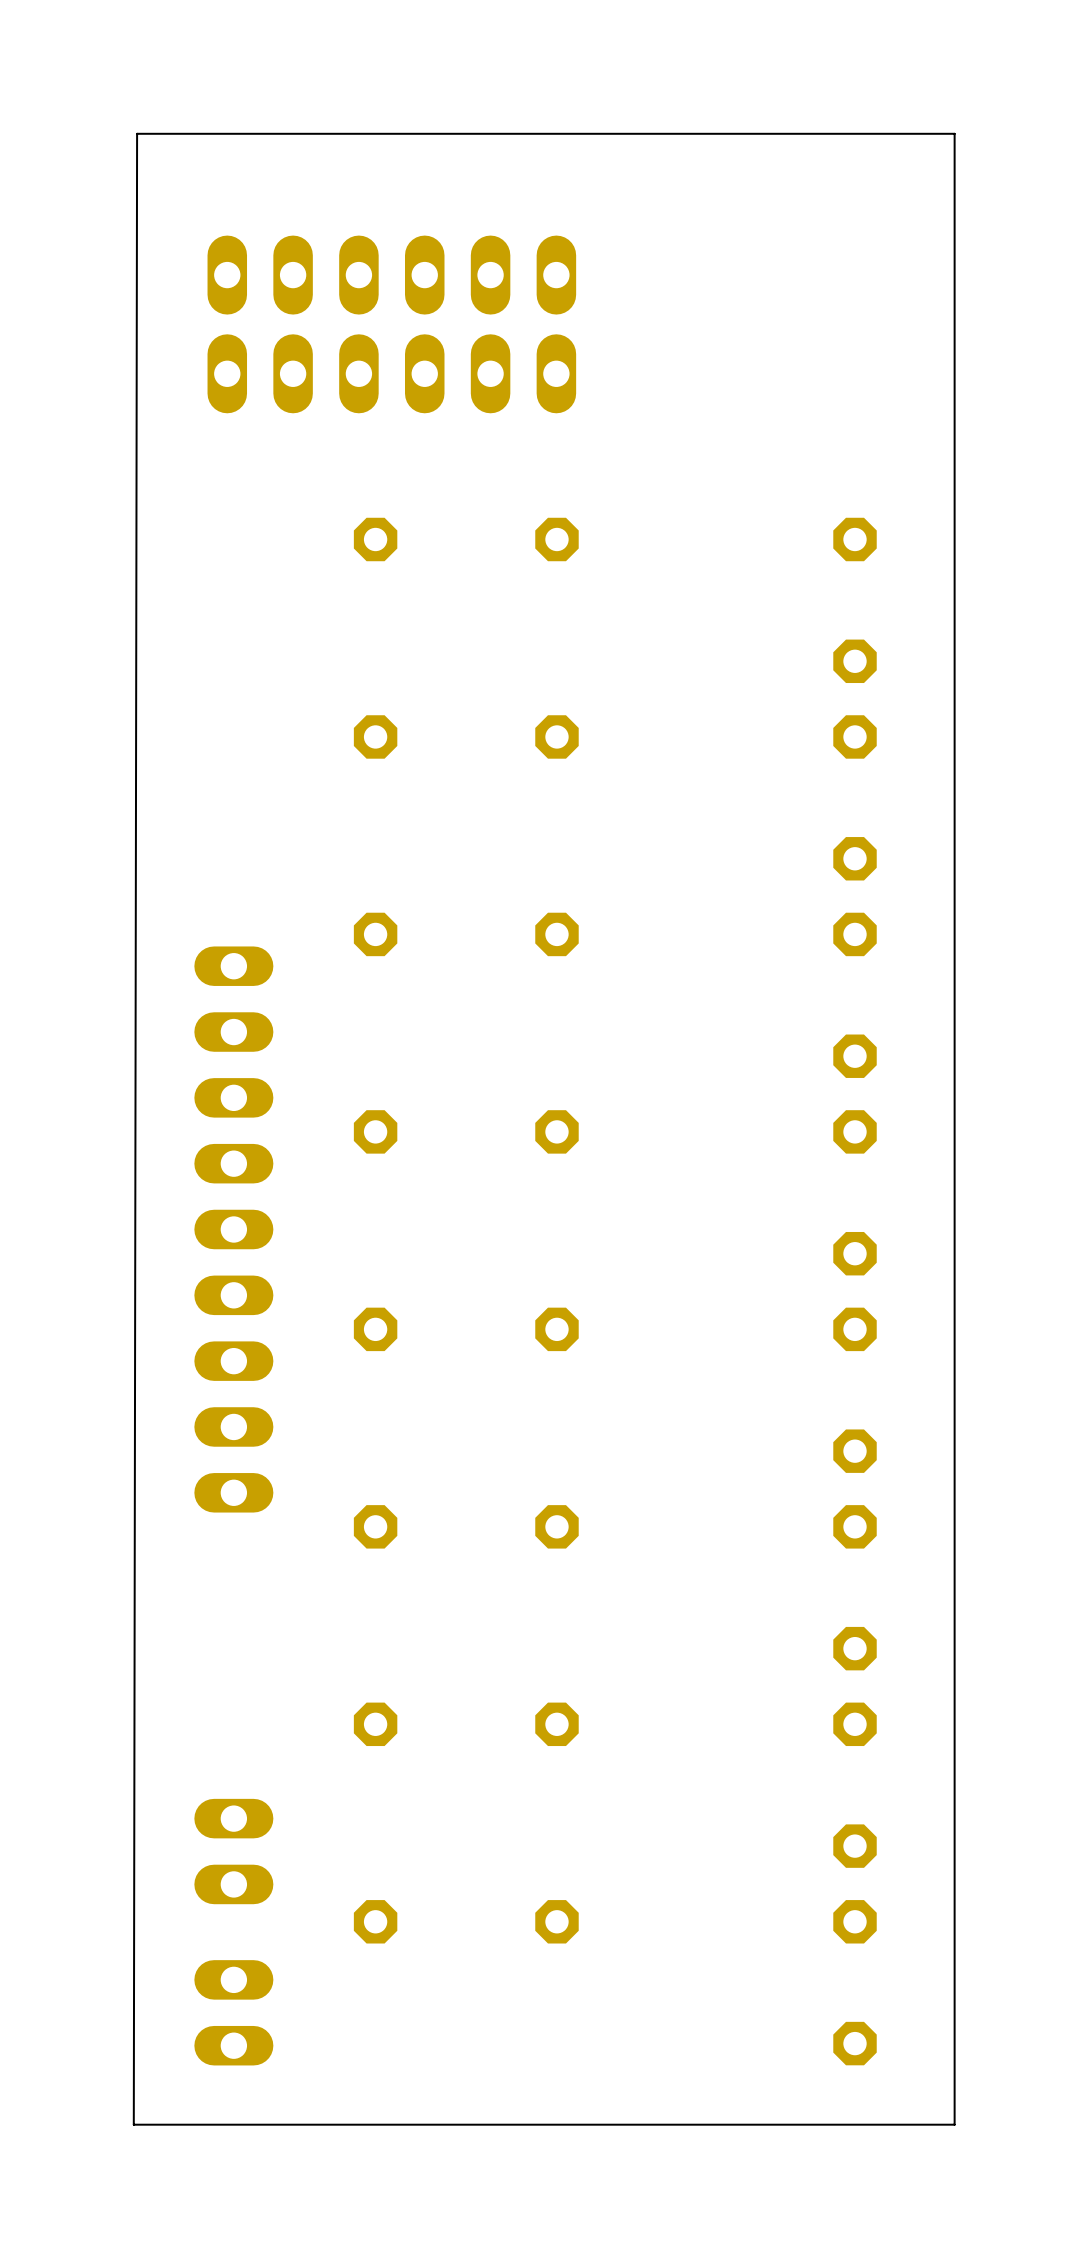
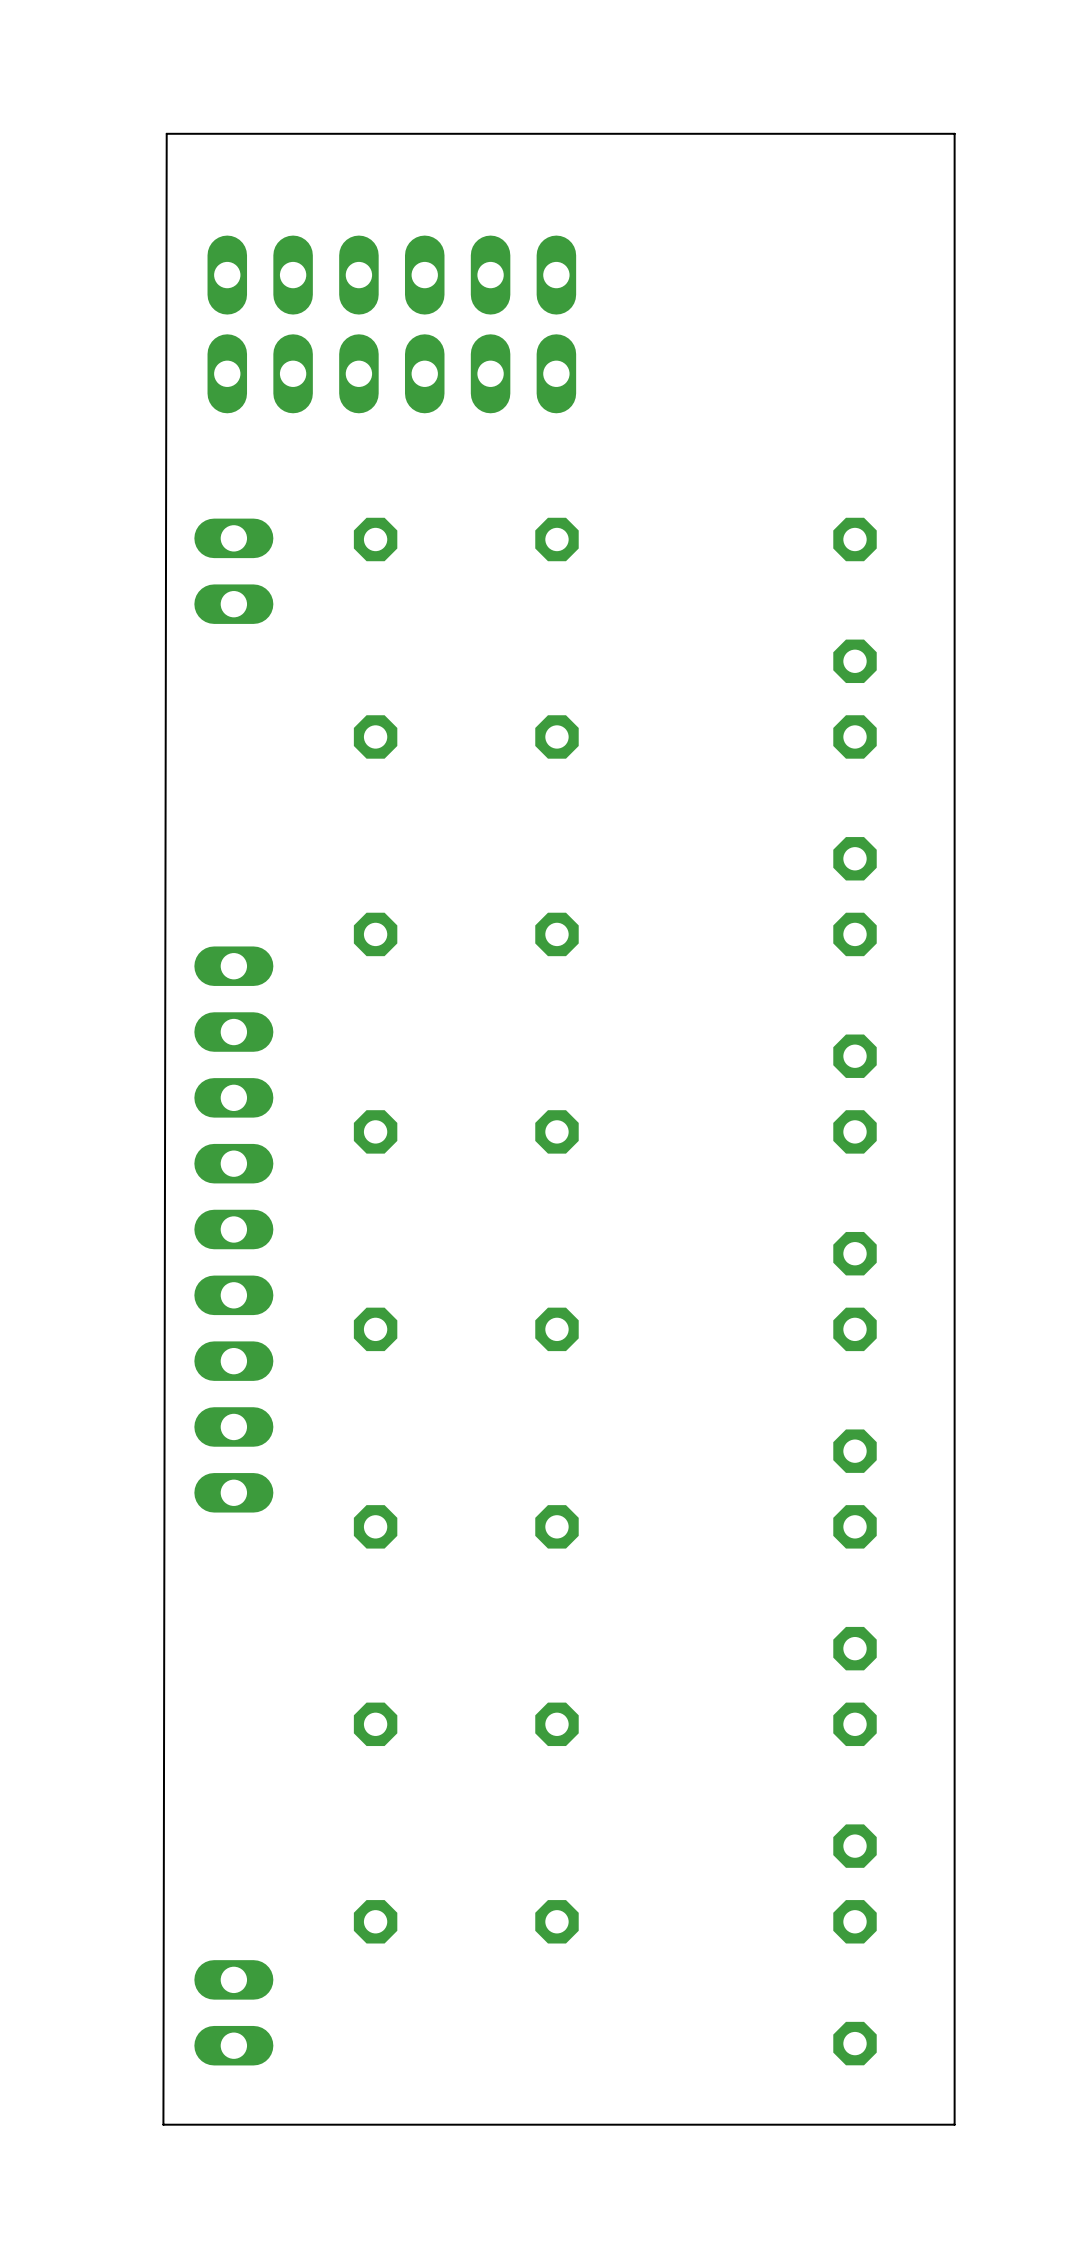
board edge: (166, 133) (137, 133) (133, 2124) (163, 2124) -> (166, 133) (163, 2124)
part: none -> (233, 571)
part: (233, 1851) -> none

